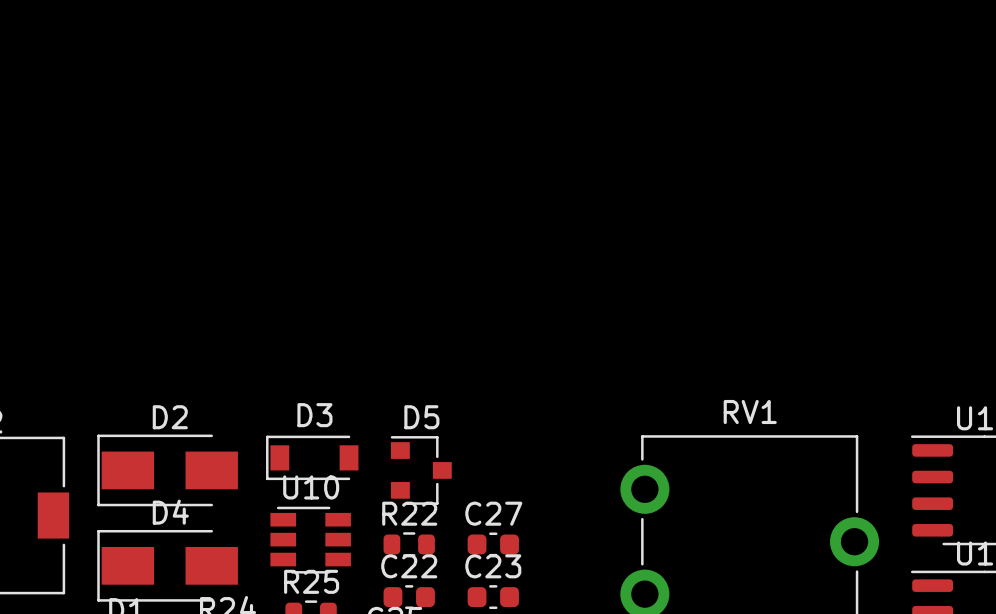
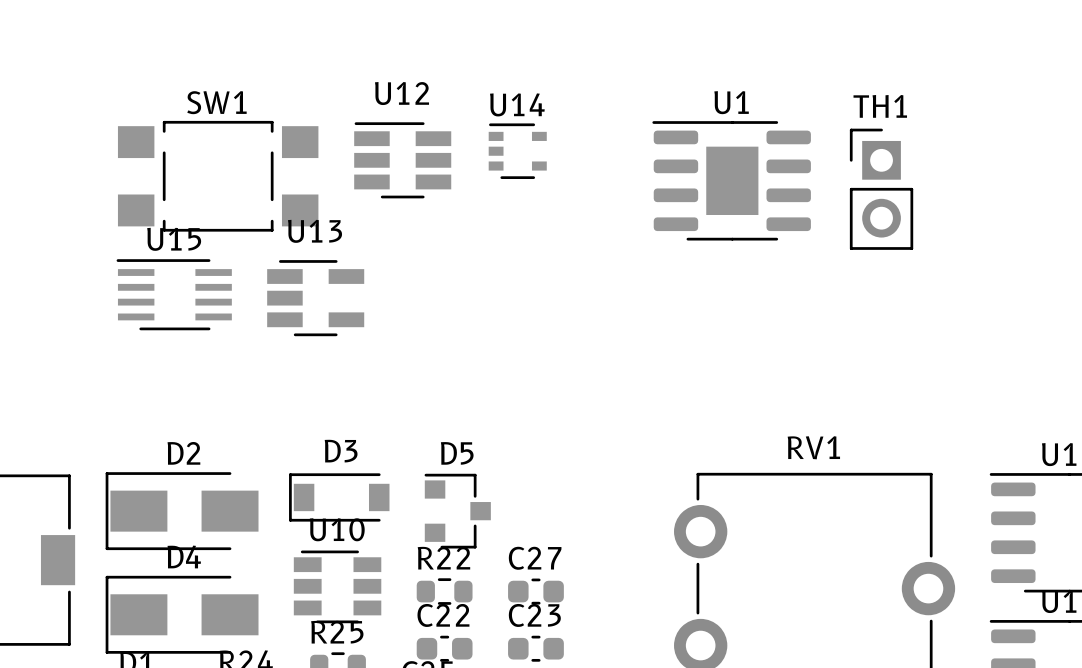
U14: none -> (517, 151)
U12: none -> (402, 160)
SW1: none -> (218, 176)
U1: none -> (731, 180)
TH1: none -> (881, 189)
U15: none -> (174, 294)
U13: none -> (315, 298)

